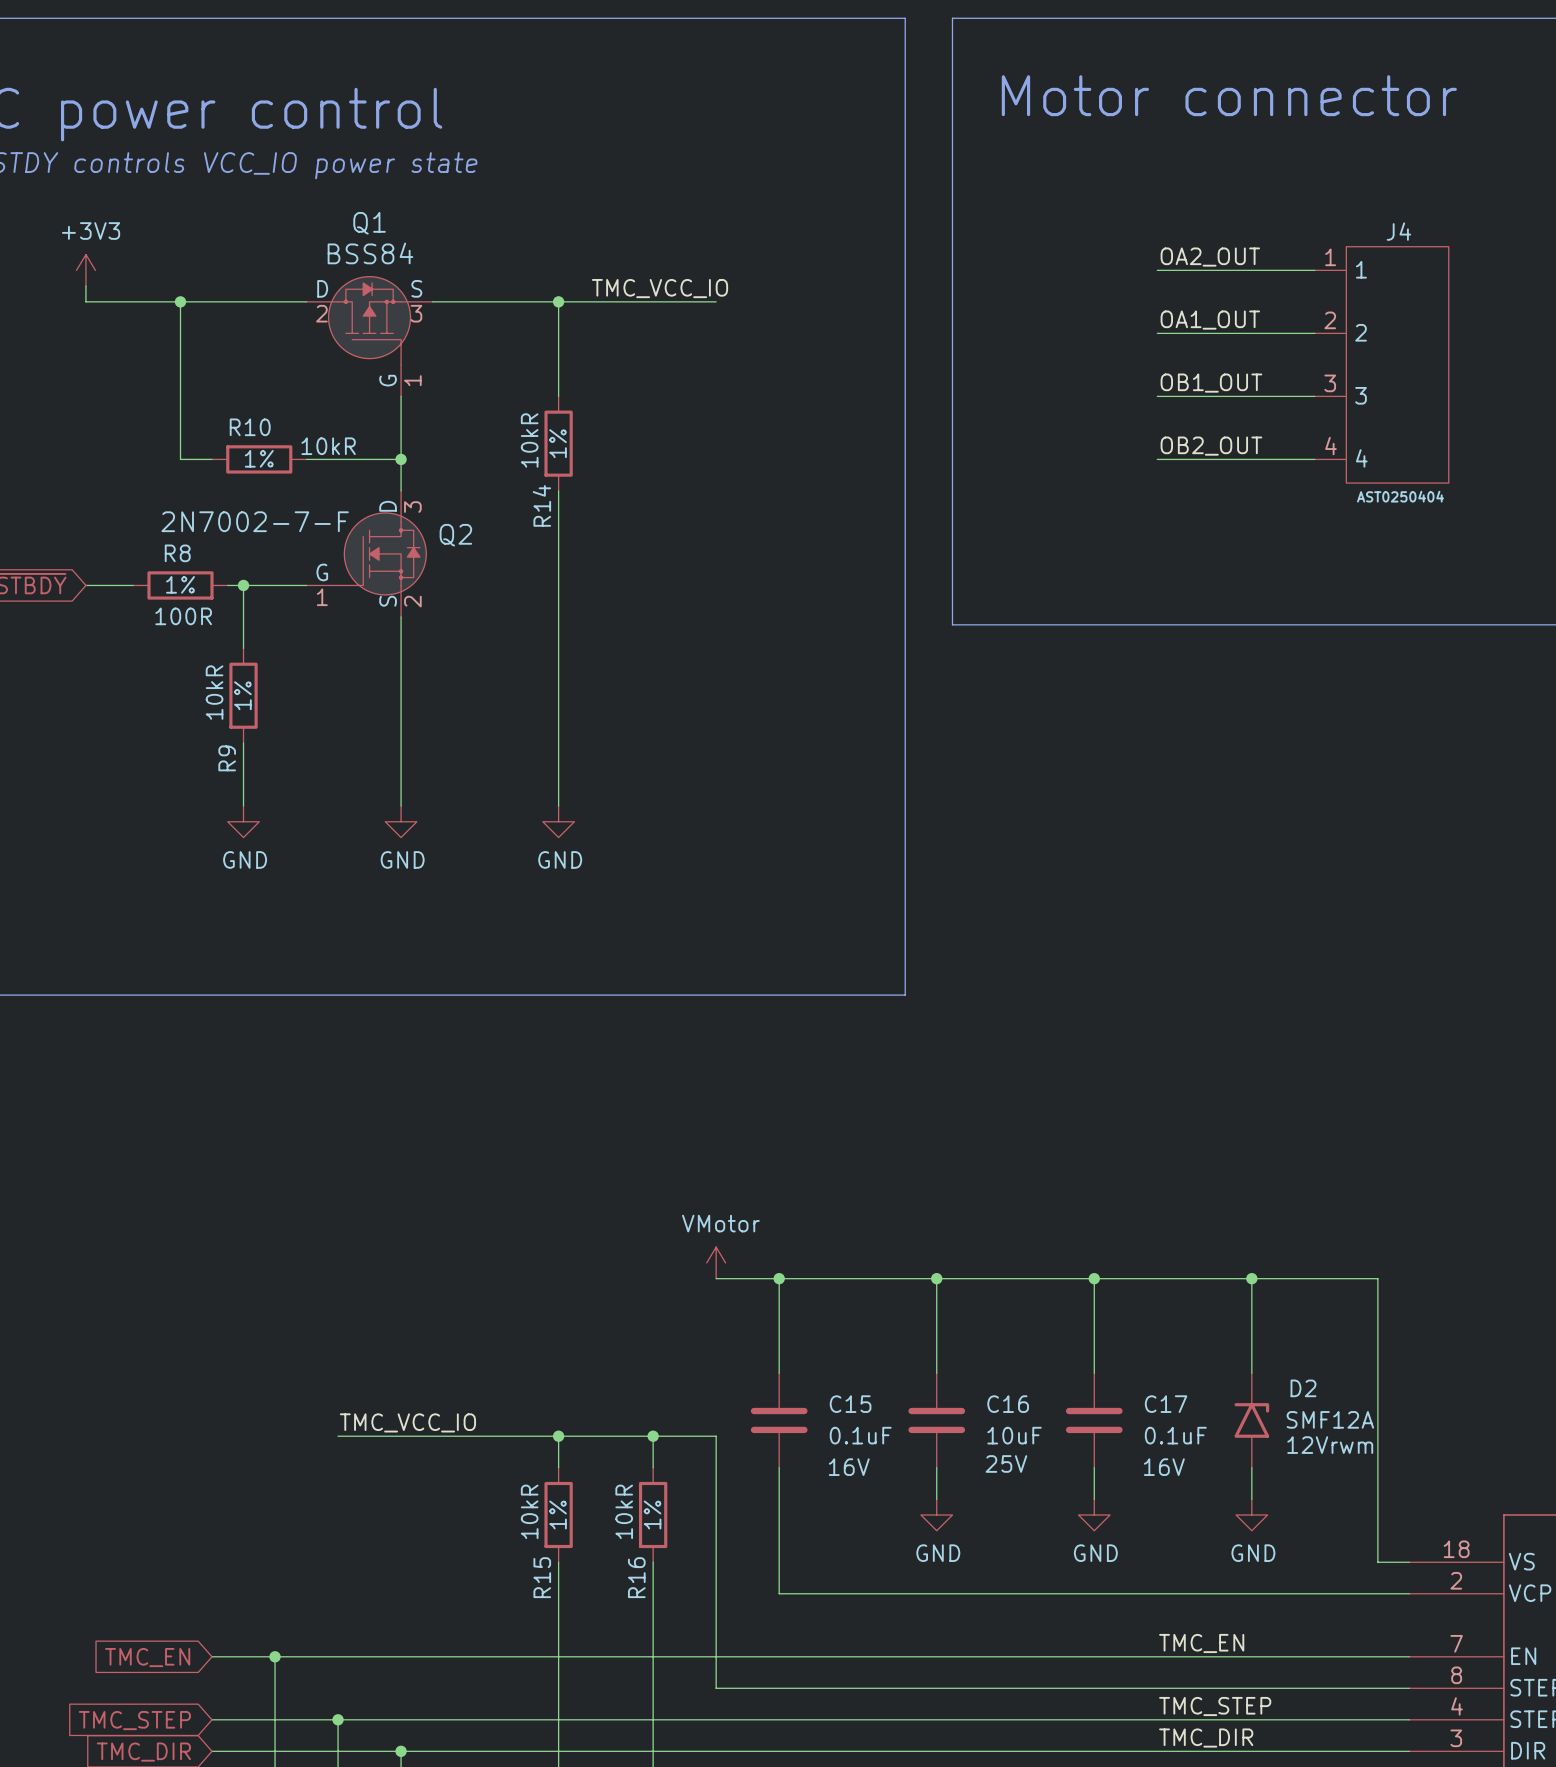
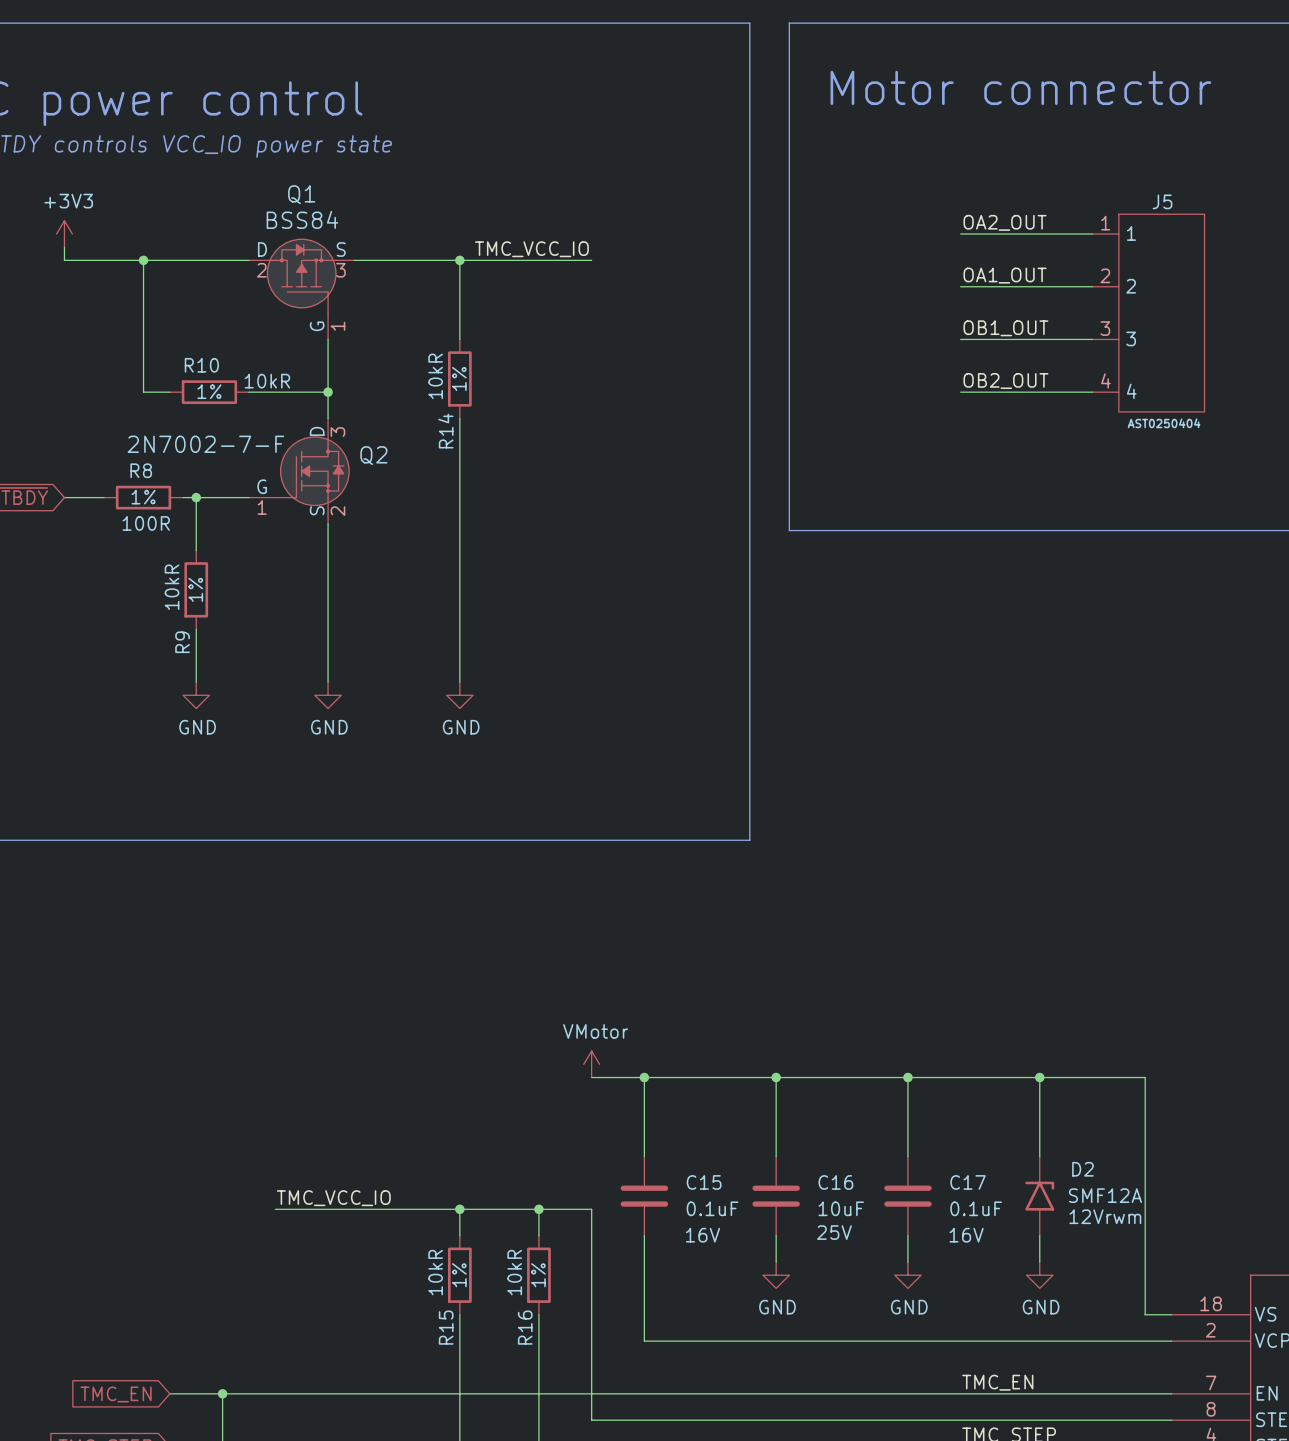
J4 name: J4 (1398, 231) -> J5 (1162, 201)
label position: TMC_VCC_IO (660, 288) -> TMC_VCC_IO (531, 249)

